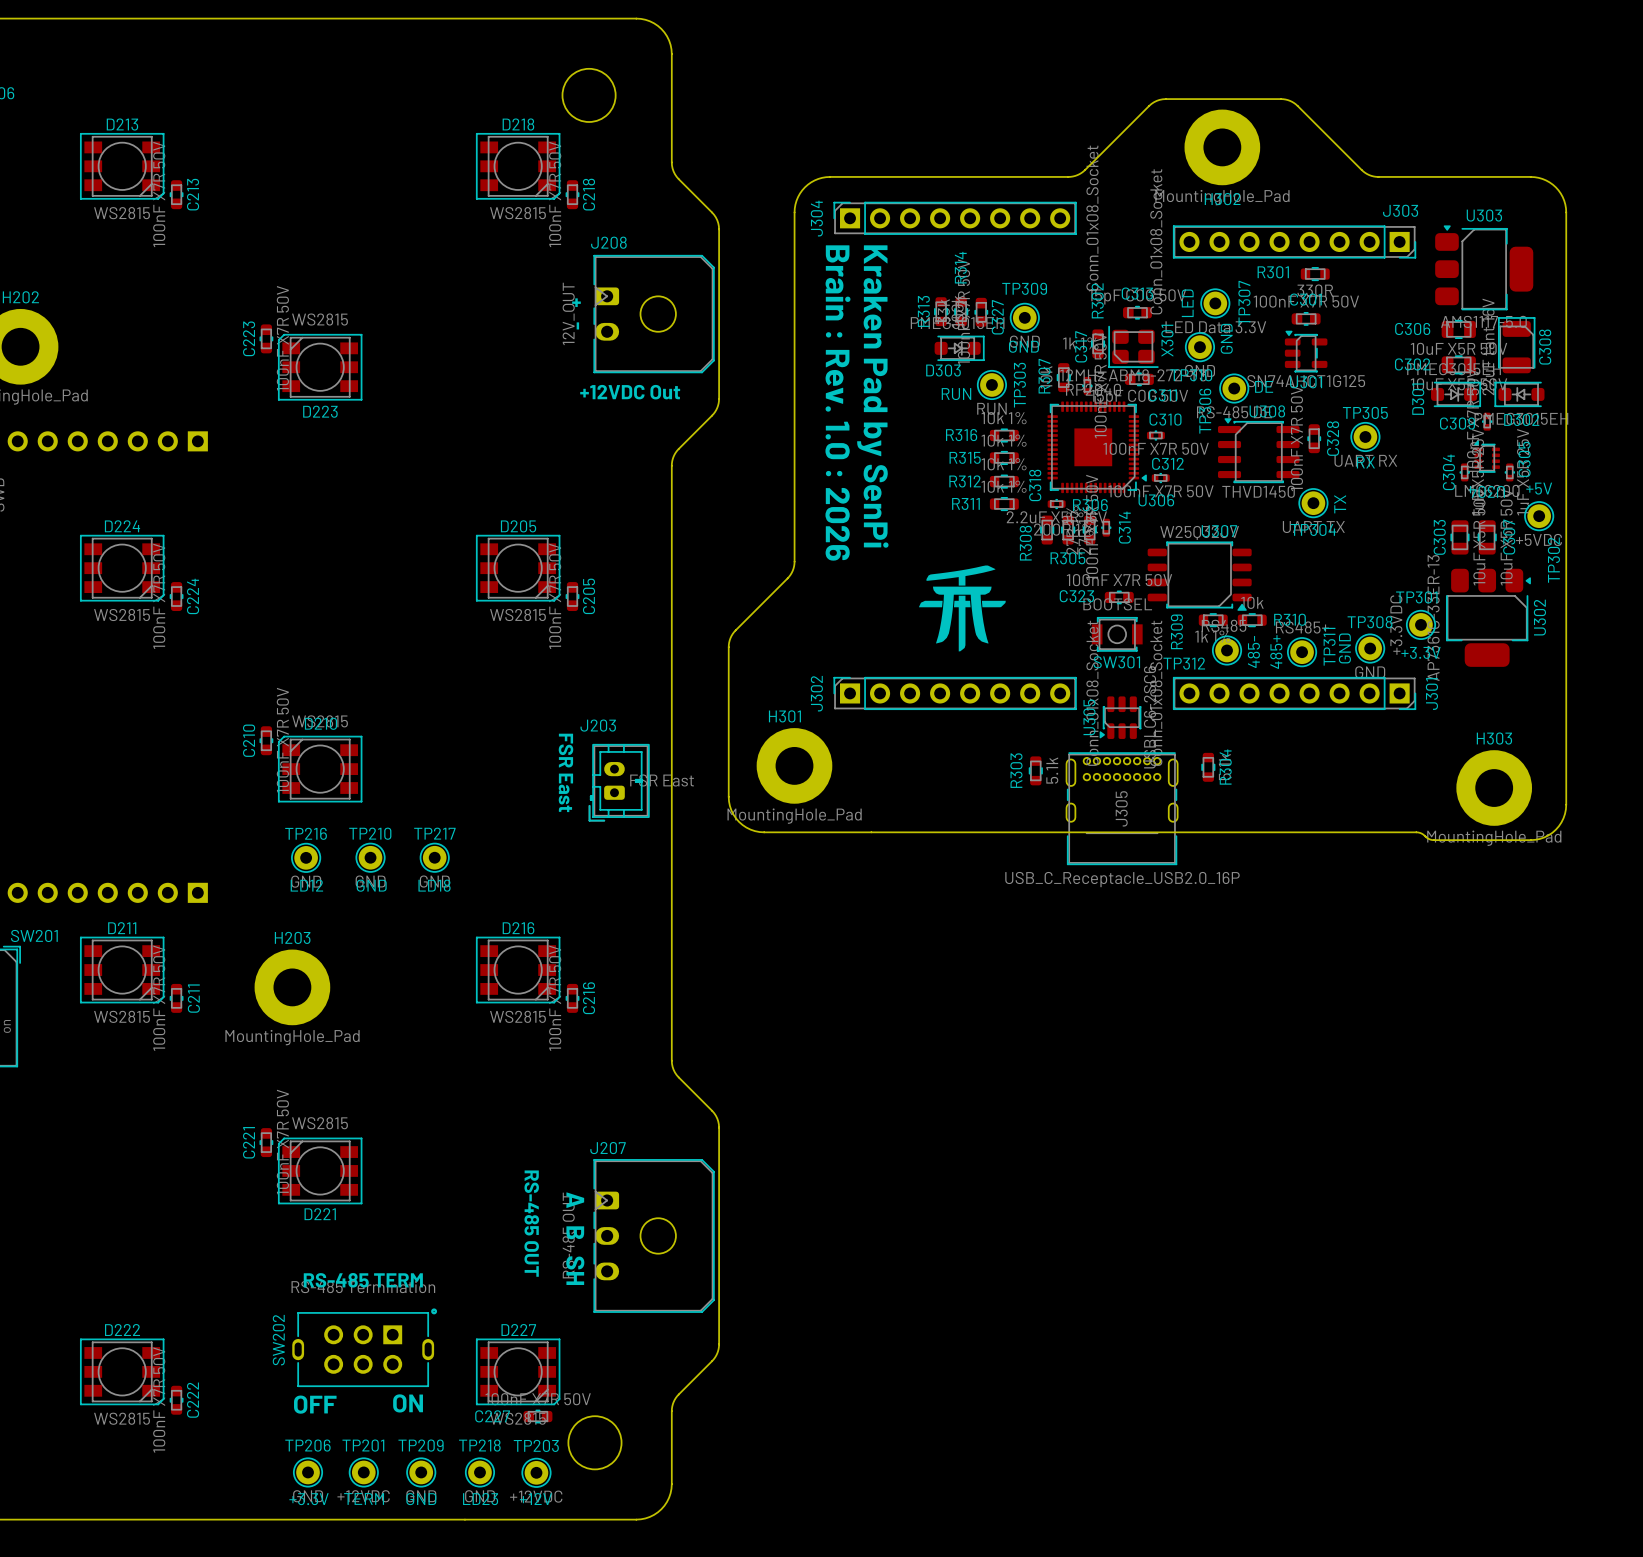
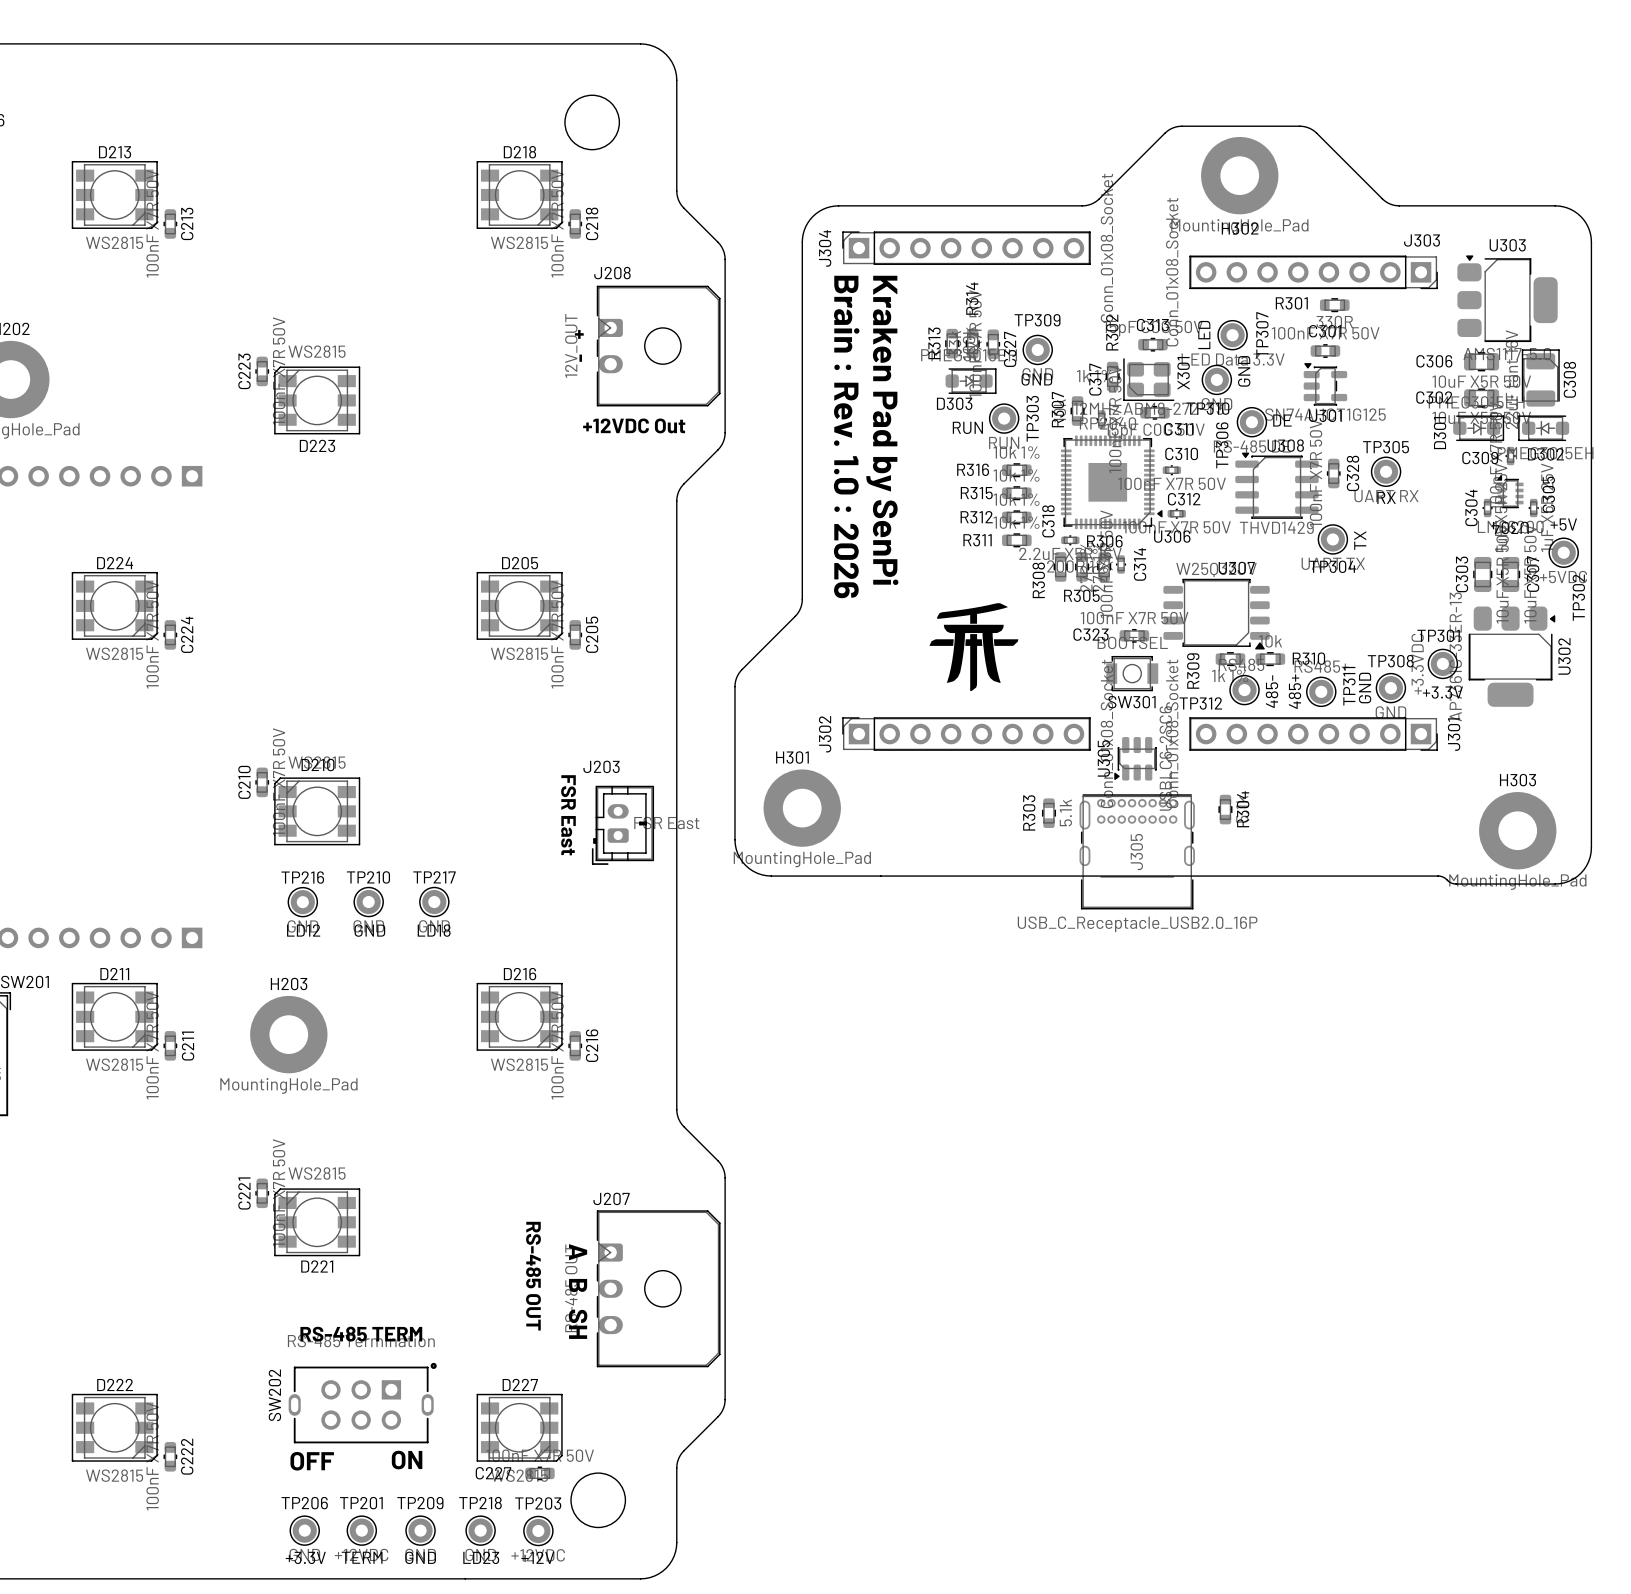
U308 value: THVD1450 (1258, 491) -> THVD1429 (1276, 527)

